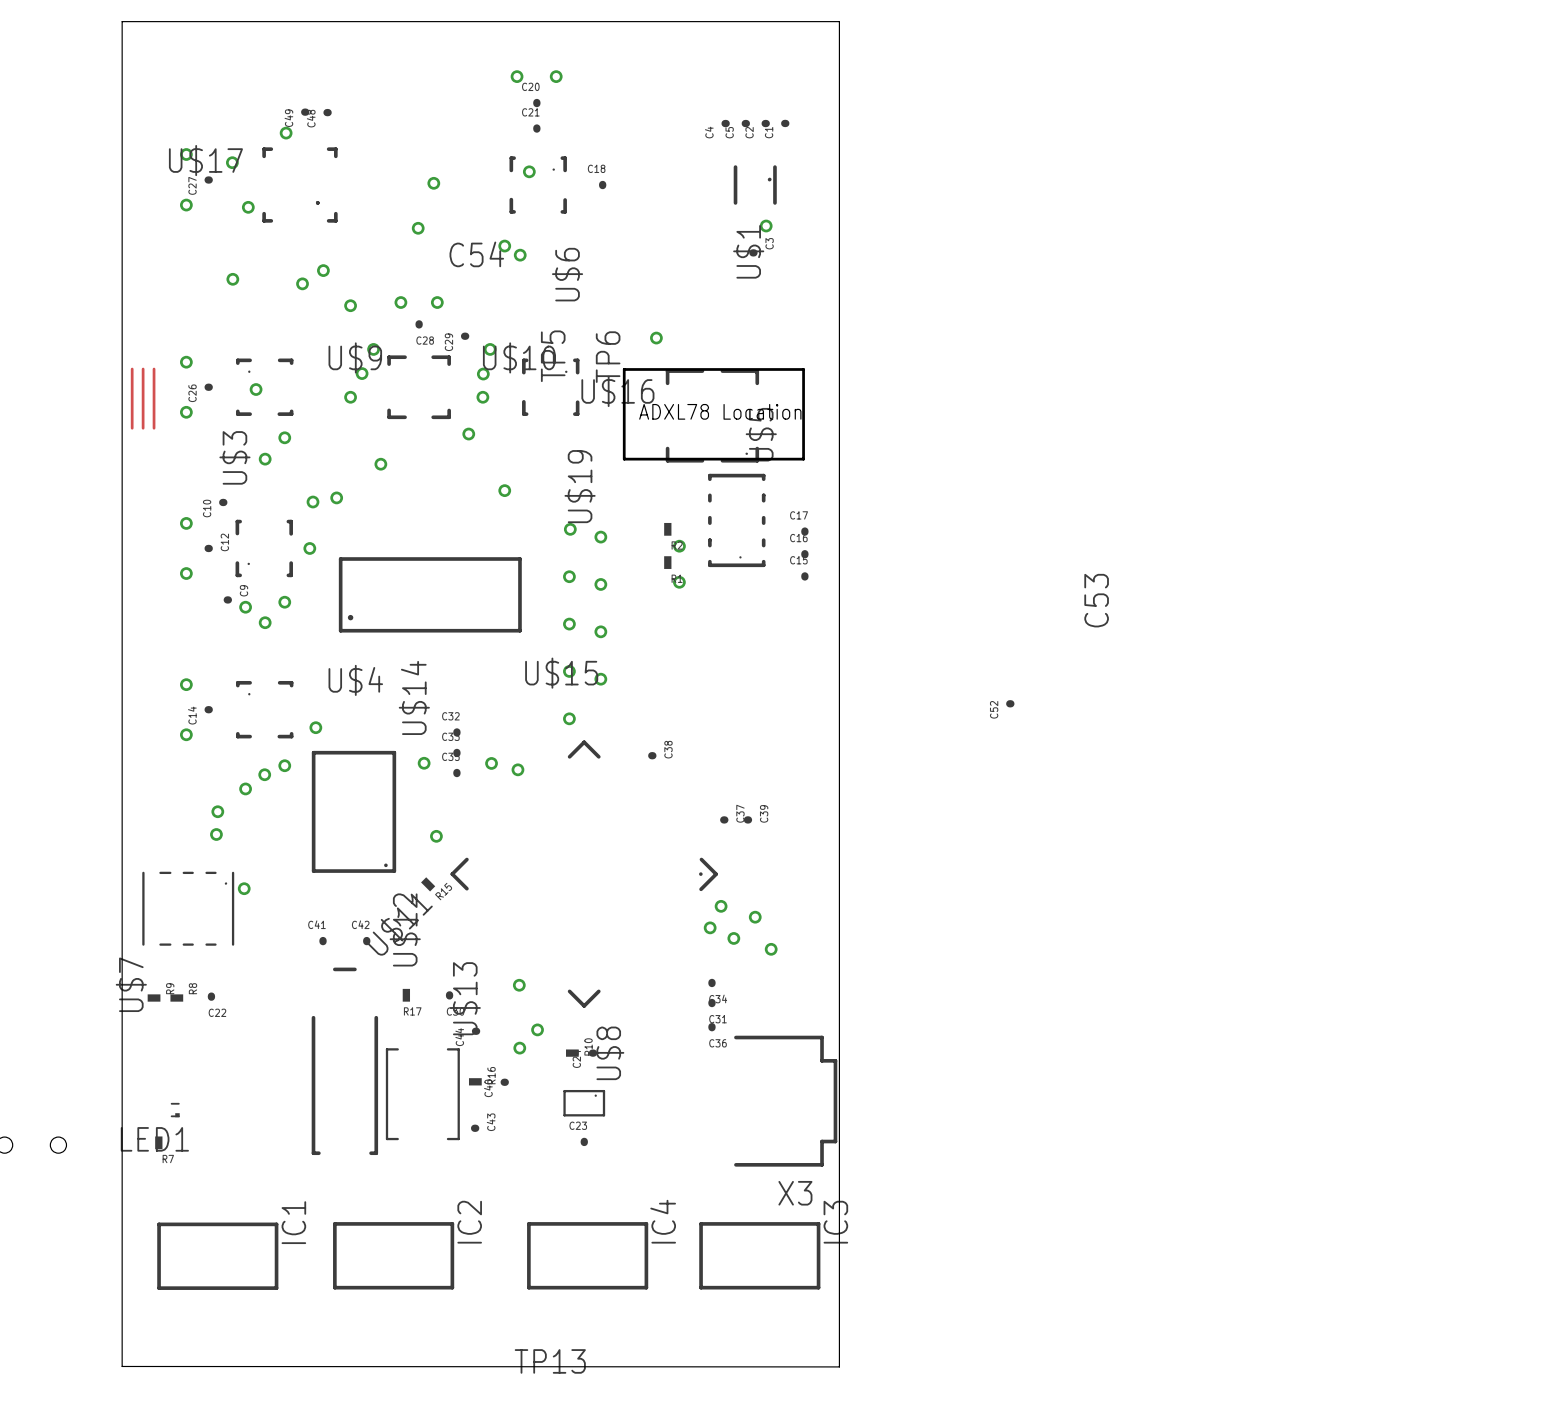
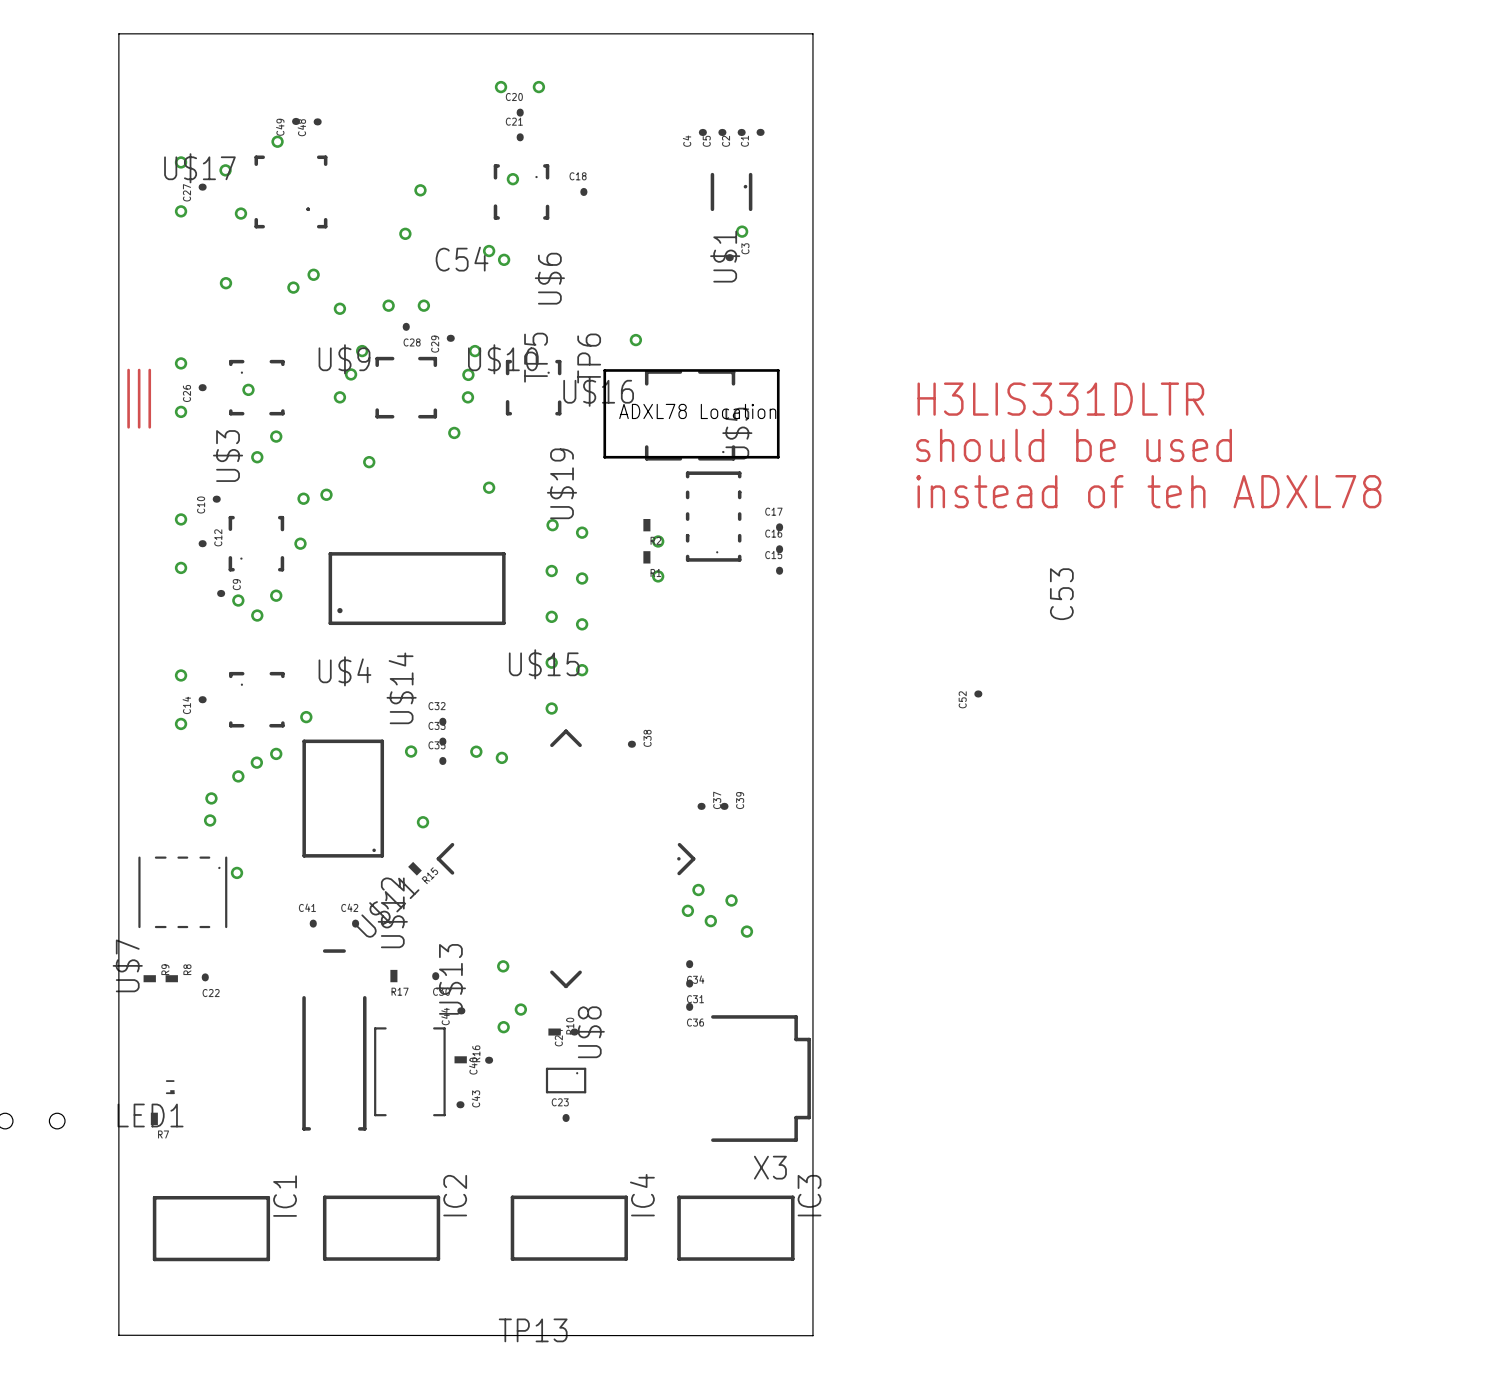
text: none -> H3LIS331DLTR (1060, 399)
text: none -> should be used (1074, 445)
text: none -> instead of teh ADXL78 (1148, 491)

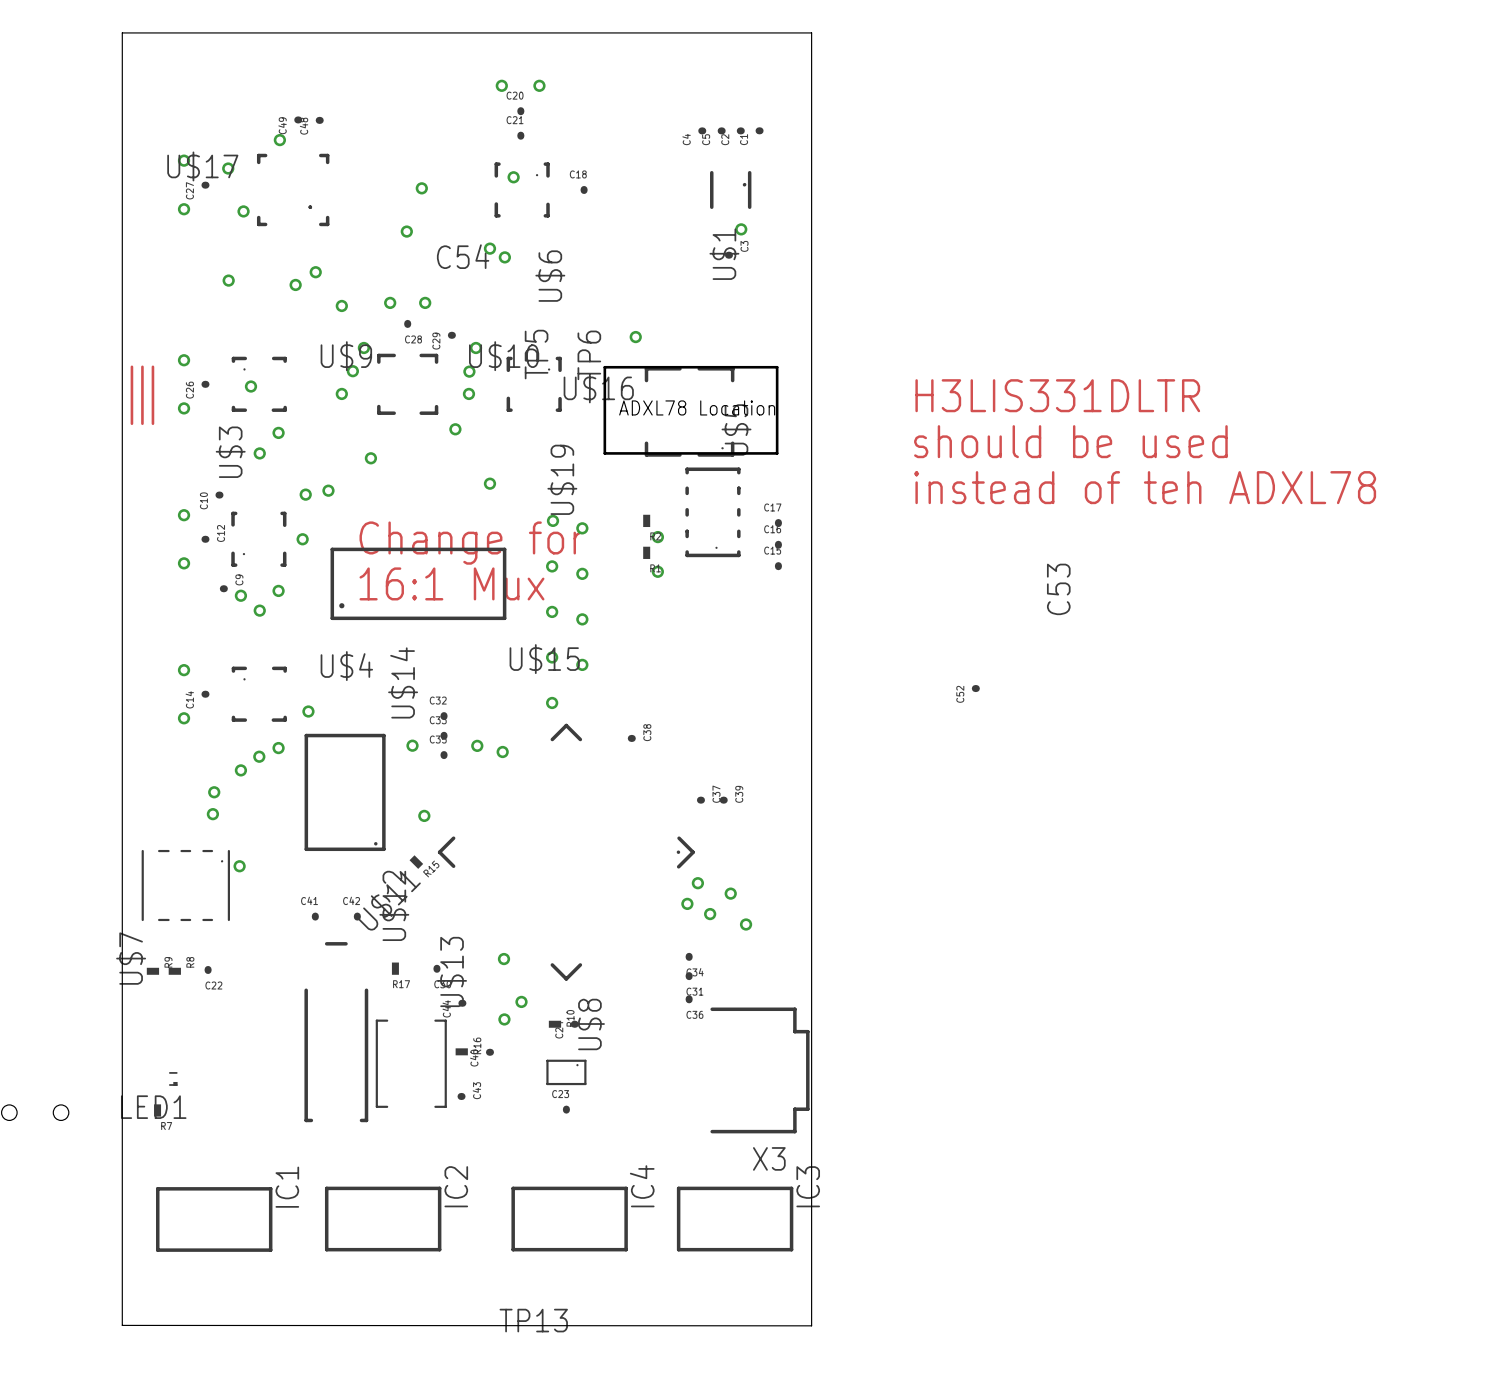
text: none -> Change for (471, 543)
text: none -> 16:1 Mux (451, 583)

